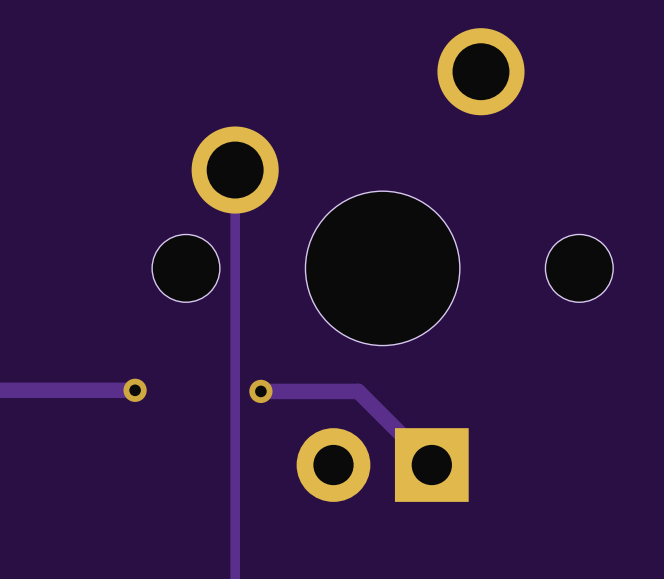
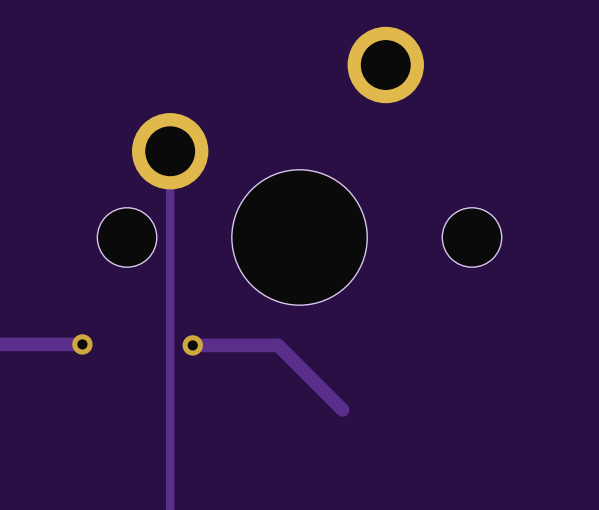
part: (382, 265) -> none

